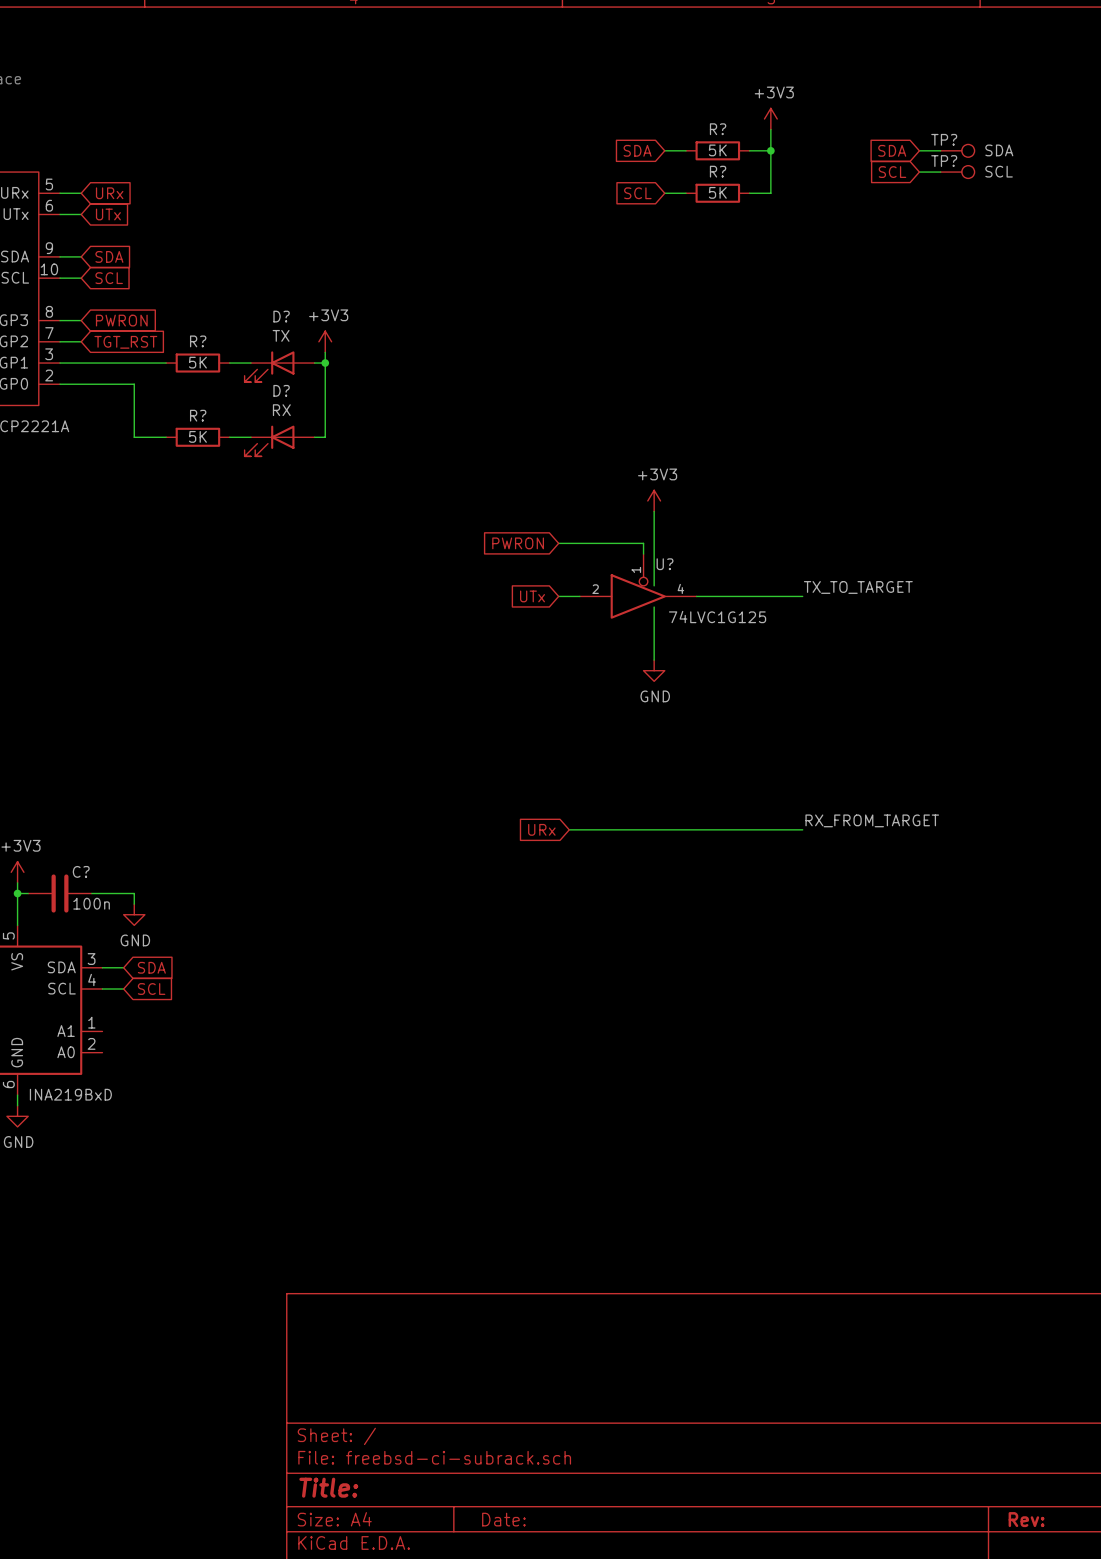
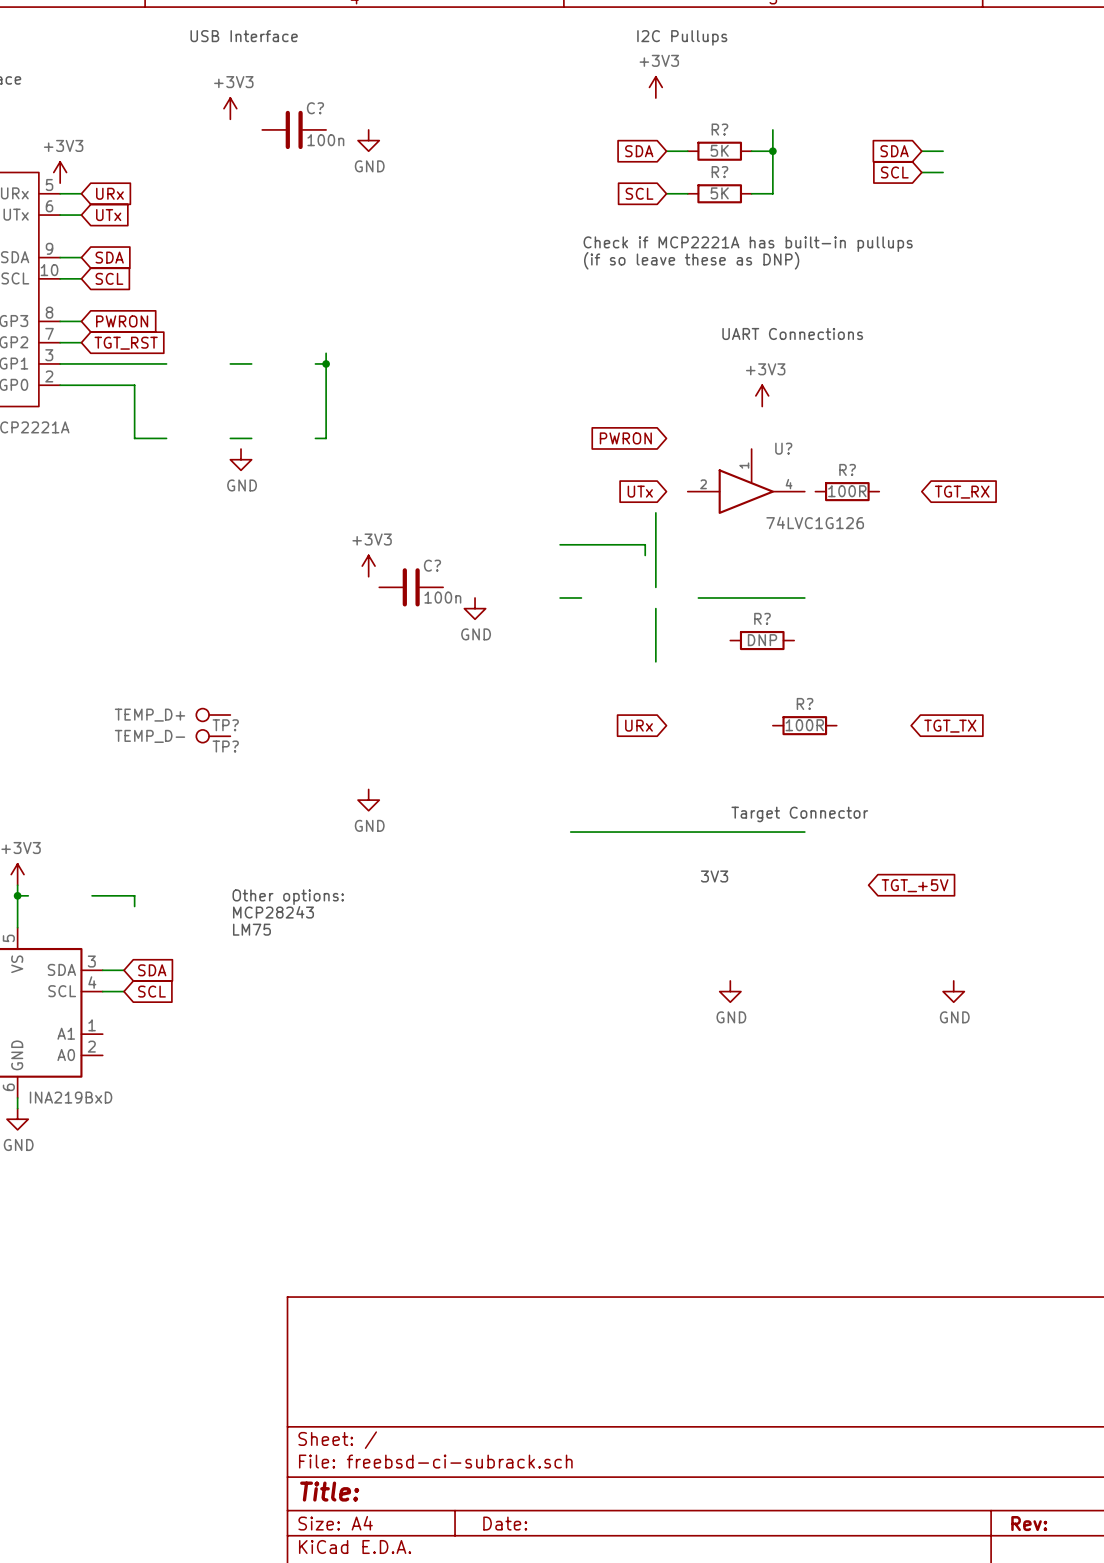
text: none -> USB Interface (244, 36)
text: none -> I2C Pullups (682, 37)
power symbol: none -> +3V3 (230, 108)
power symbol position: +3V3 (770, 118) -> +3V3 (655, 87)
C?: none -> 100n (294, 129)
power symbol: none -> GND (368, 140)
TP?: SDA (957, 150) -> none
power symbol: none -> +3V3 (60, 172)
TP?: SCL (957, 172) -> none
text: none -> Check if MCP2221A has built-in pullups (748, 244)
text: none -> (if so leave these as DNP) (691, 260)
text: none -> UART Connections (792, 333)
power symbol: +3V3 (325, 341) -> none
R?: 5K (197, 363) -> none
D?: TX (279, 366) -> none
power symbol: none -> +3V3 (762, 395)
R?: 5K (197, 437) -> none
D?: RX (279, 441) -> none
power symbol: none -> GND (241, 459)
U?: none -> 74LVC1G126 (746, 481)
R?: none -> 100R (847, 491)
global label: none -> TGT_RX (962, 492)
power symbol: +3V3 (654, 500) -> none
global label position: PWRON (518, 543) -> PWRON (625, 438)
power symbol: none -> +3V3 (368, 566)
C?: none -> 100n (411, 587)
U?: 74LVC1G125 (638, 586) -> none
label: TX_TO_TARGET (858, 587) -> none
global label position: UTx (532, 596) -> UTx (640, 491)
power symbol: none -> GND (475, 608)
R?: none -> DNP (762, 640)
power symbol: GND (654, 670) -> none
TP?: none -> TEMP_D+ (213, 715)
R?: none -> 100R (804, 725)
global label: none -> TGT_TX (950, 726)
TP?: none -> TEMP_D- (213, 736)
power symbol: none -> GND (368, 800)
text: none -> Target Connector (799, 814)
label: RX_FROM_TARGET (872, 820) -> none
global label position: URx (541, 829) -> URx (639, 725)
text: none -> 3V3 (714, 876)
global label: none -> TGT_+5V (915, 885)
C?: 100n (60, 893) -> none
text: none -> Other options: (288, 897)
text: none -> MCP28243 (273, 912)
power symbol: GND (134, 914) -> none
text: none -> LM75 (251, 929)
power symbol: none -> GND (730, 991)
power symbol: none -> GND (953, 991)

